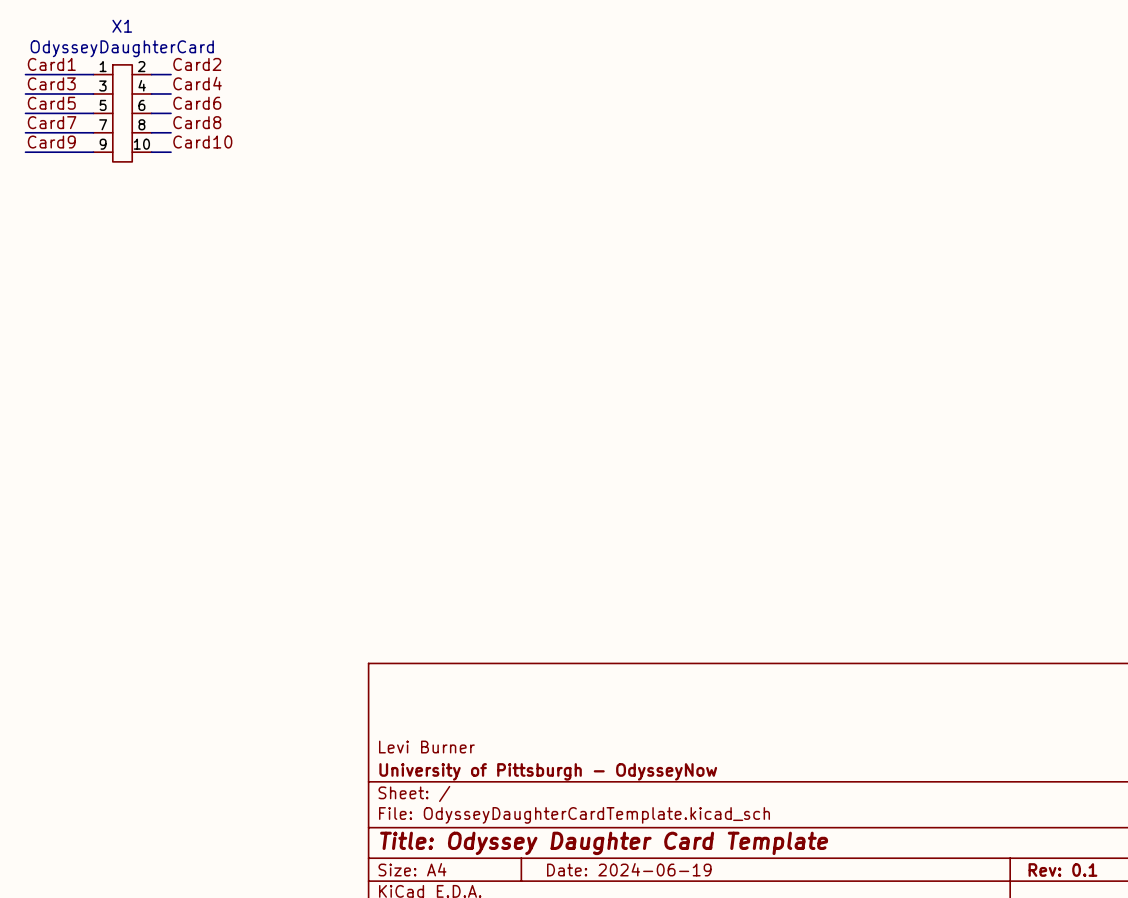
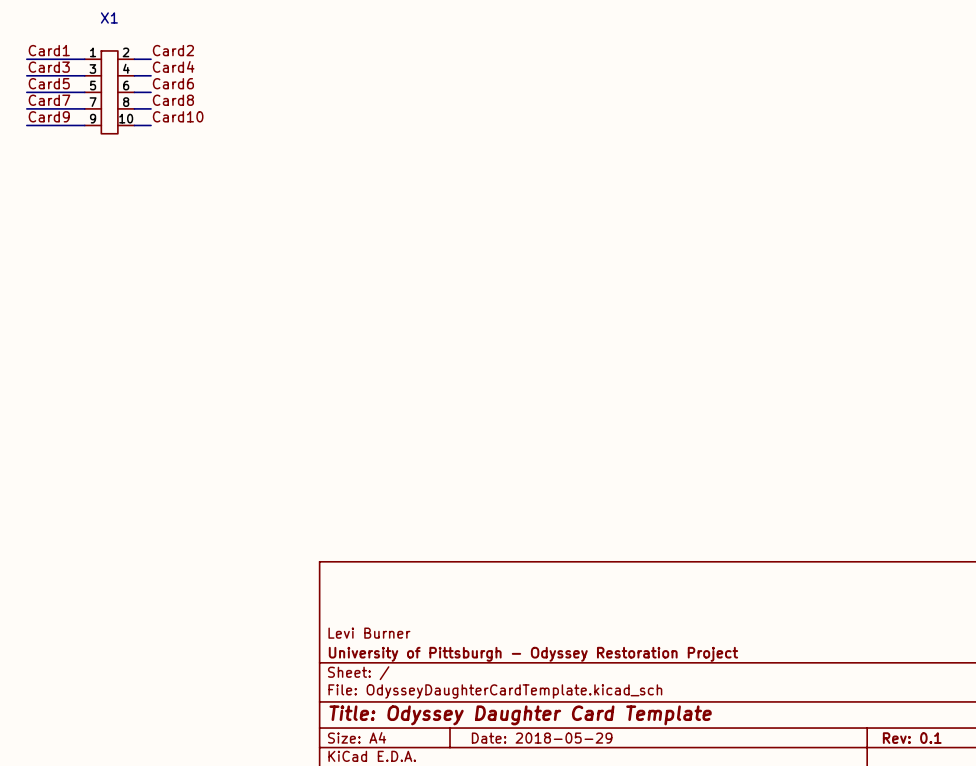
X1 value: OdysseyDaughterCard (122, 48) -> none
title block: University of Pittsburgh - OdysseyNow (548, 771) -> University of Pittsburgh - Odyssey Restoration Project (533, 654)
title block: Date: 2024-06-19 (629, 869) -> Date: 2018-05-29 (542, 738)

